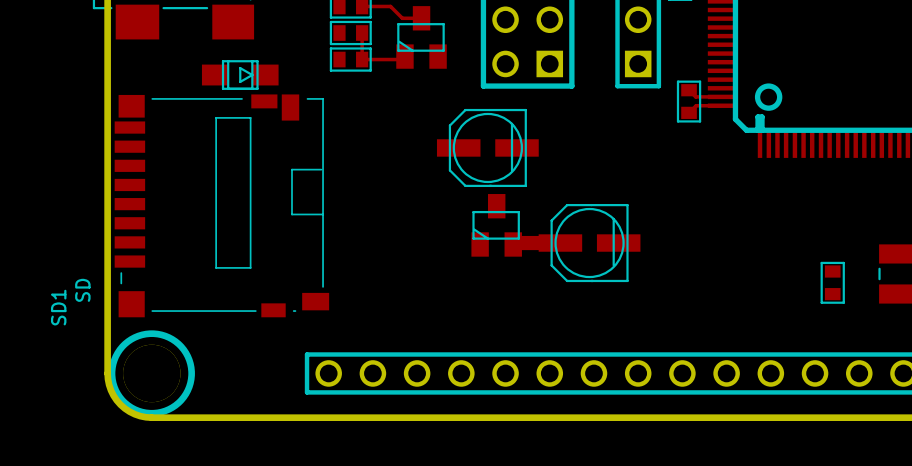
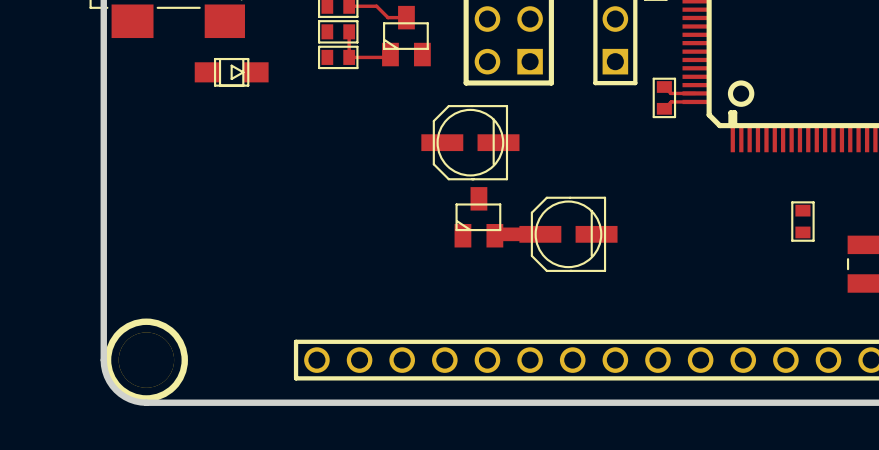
SD1: SD (221, 205) -> none
part position: (832, 282) -> (802, 221)

